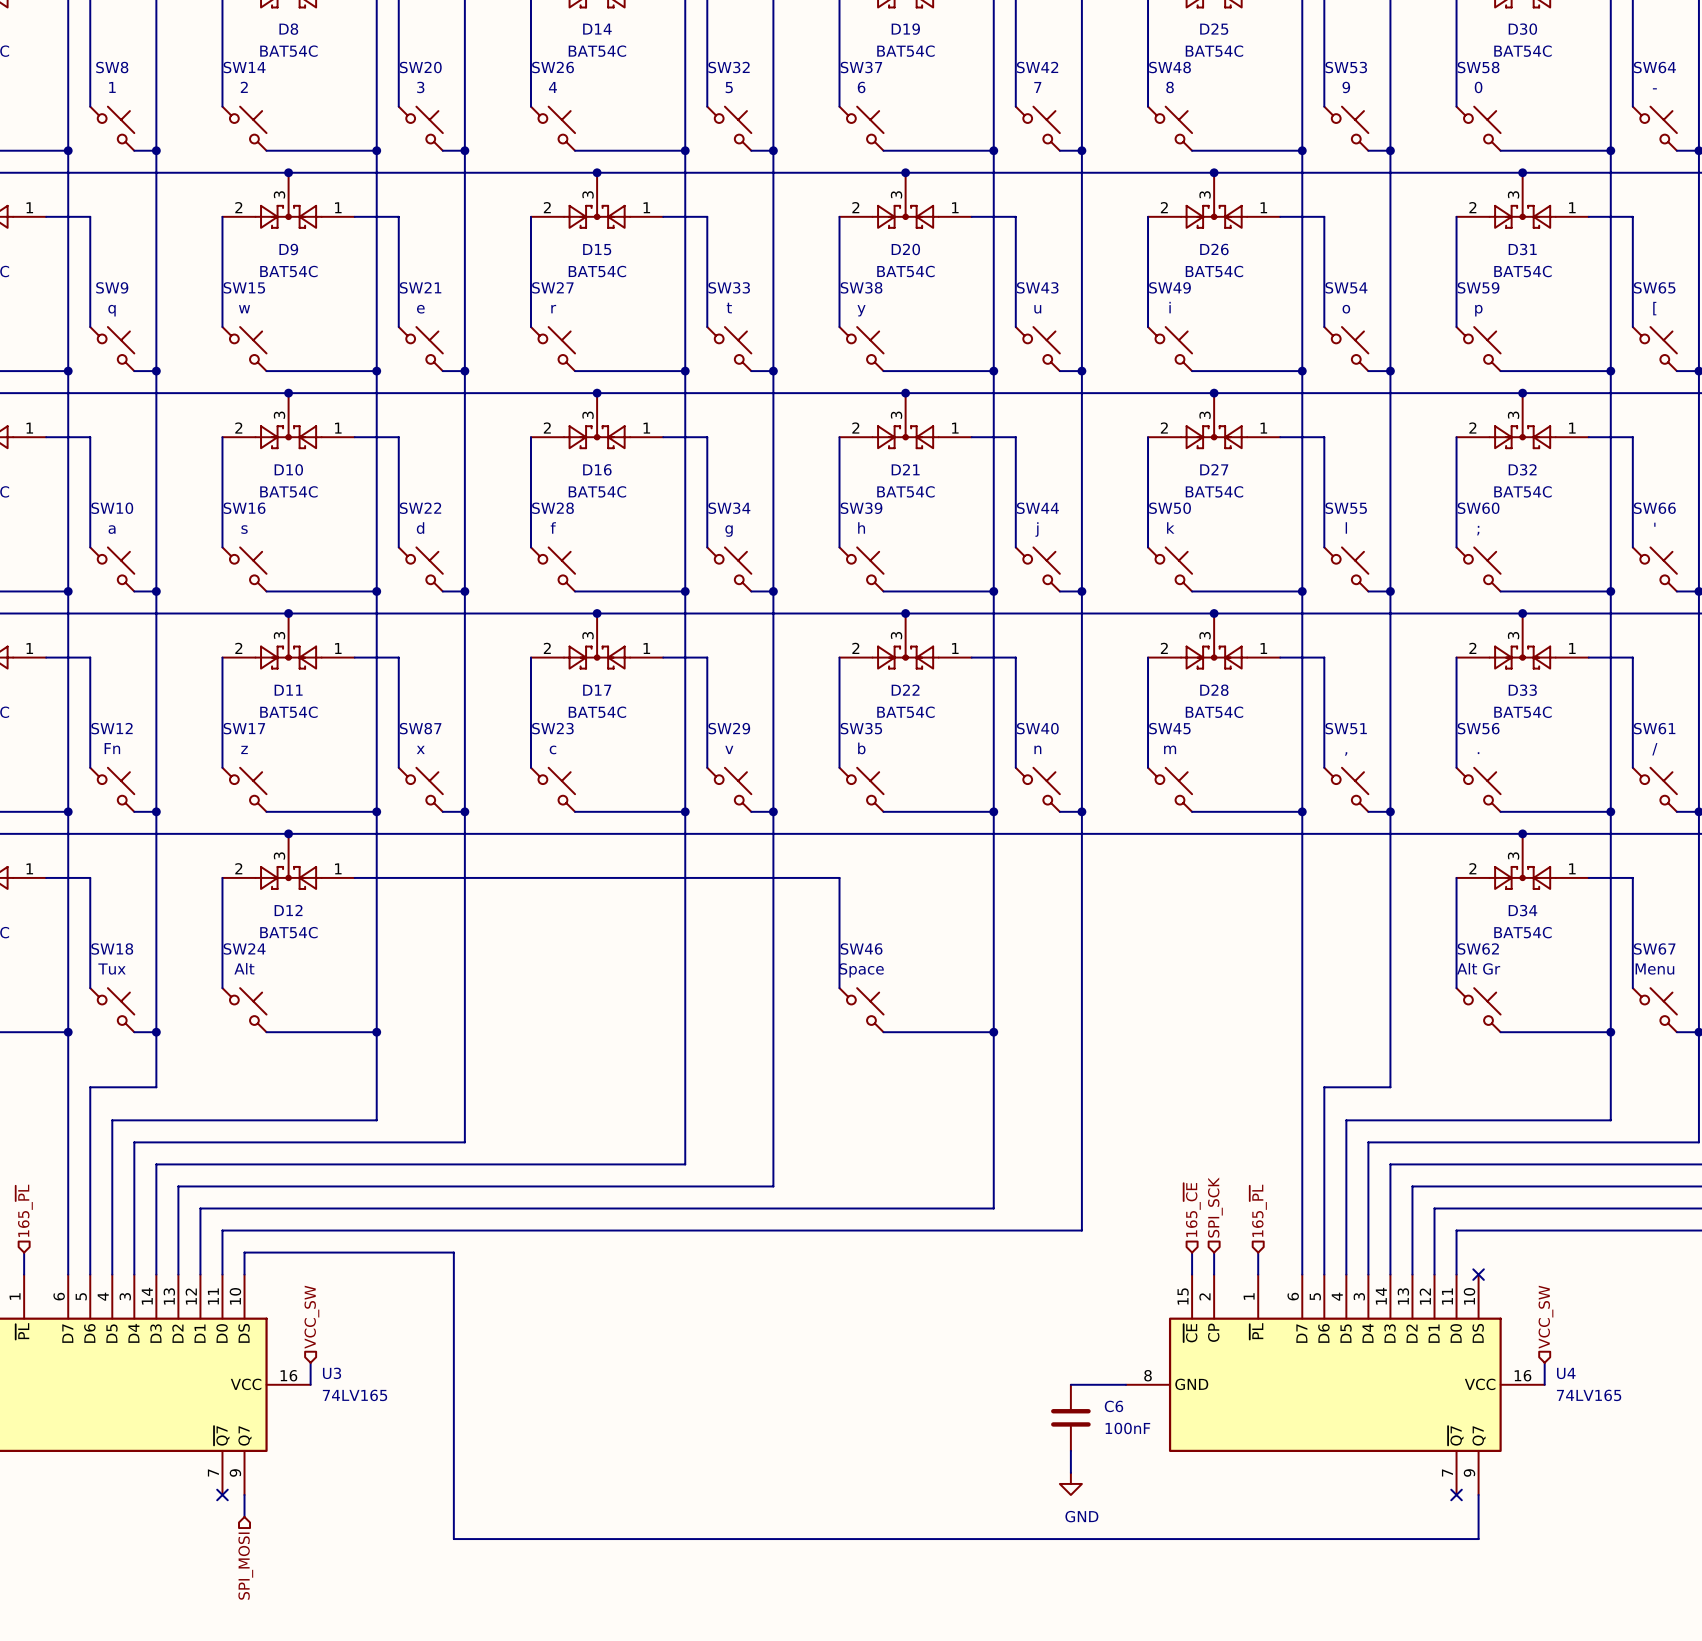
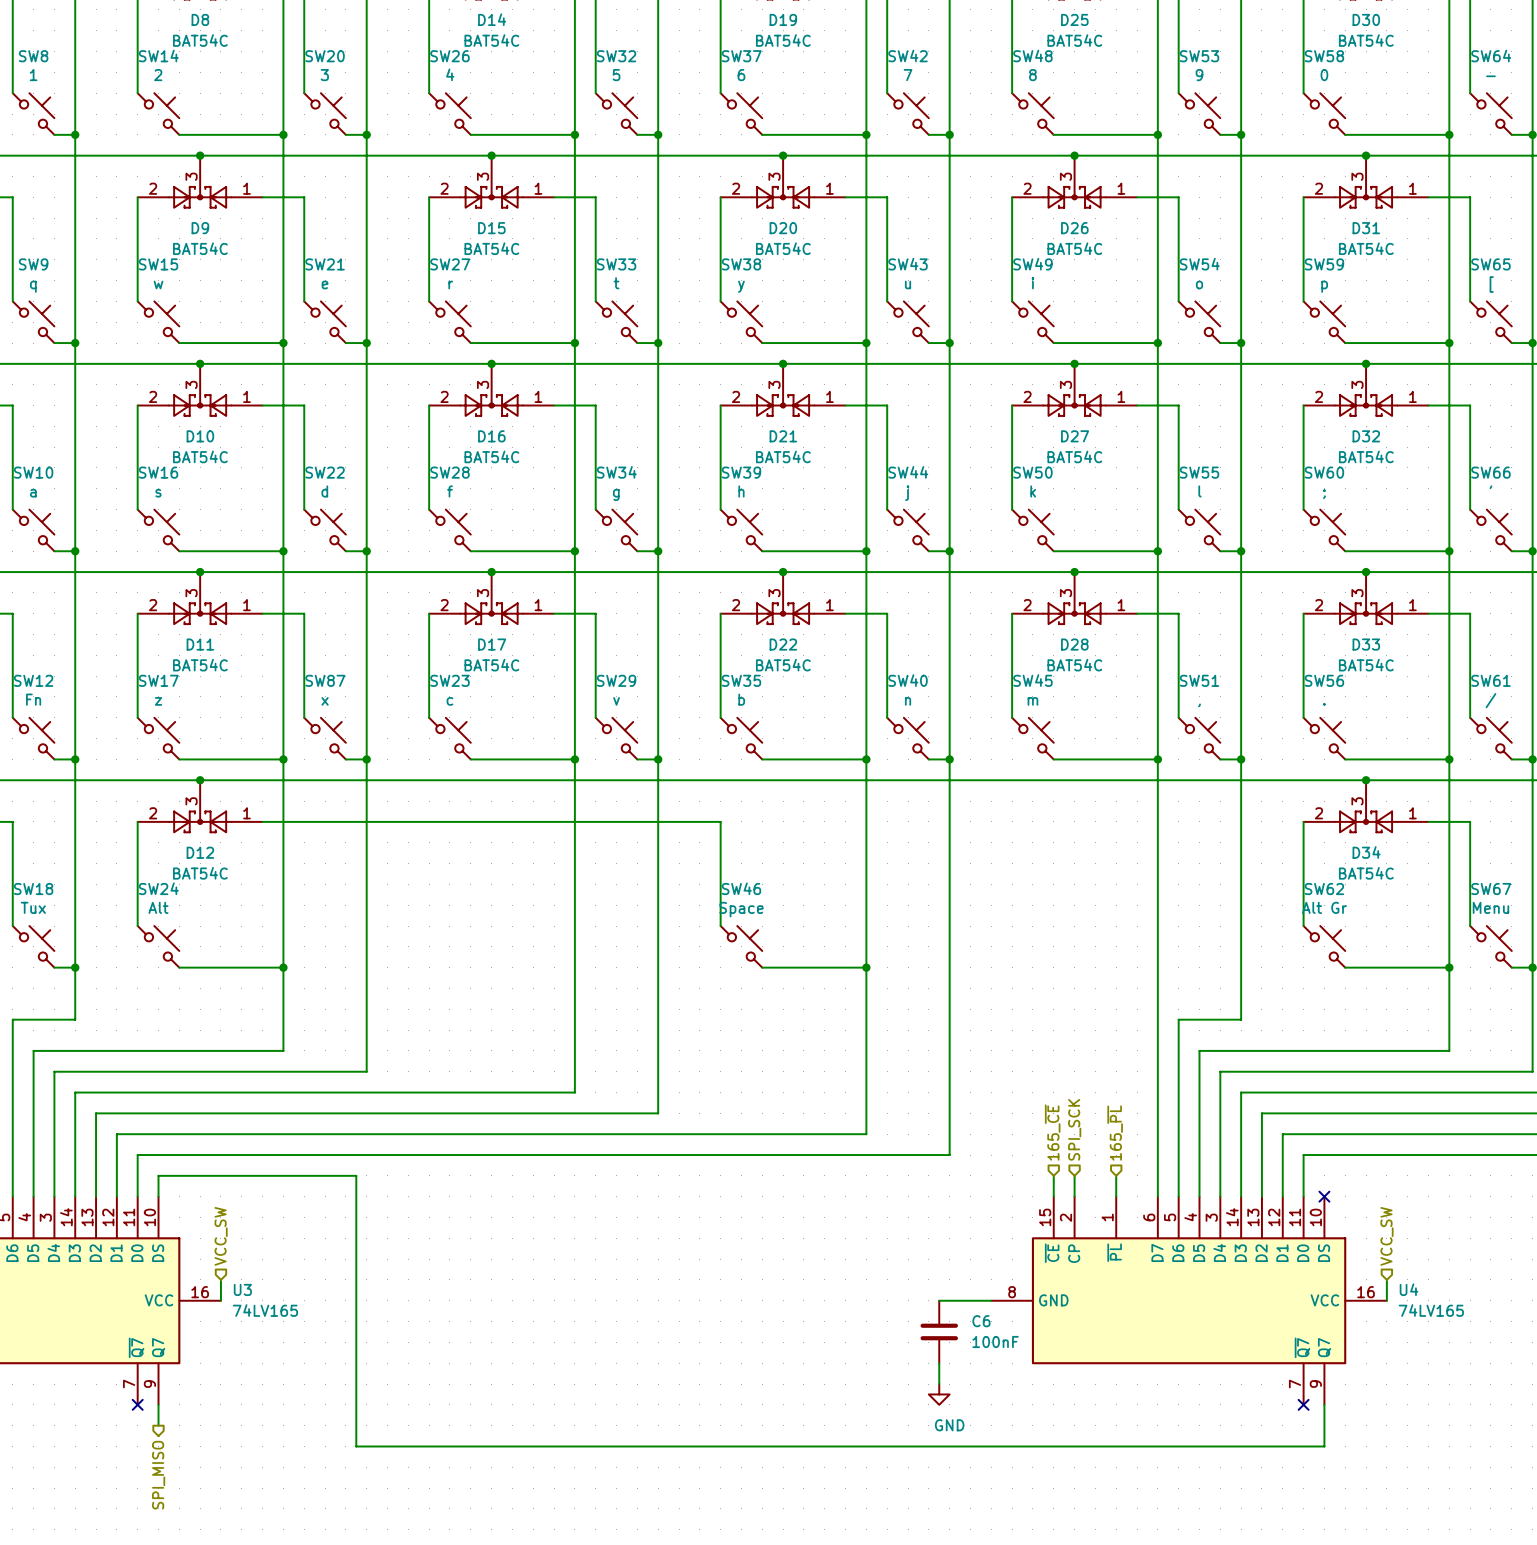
hierarchical label shape: input (245, 1566) -> output (158, 1475)
hierarchical label: SPI_MOSI (245, 1566) -> SPI_MISO (158, 1475)

